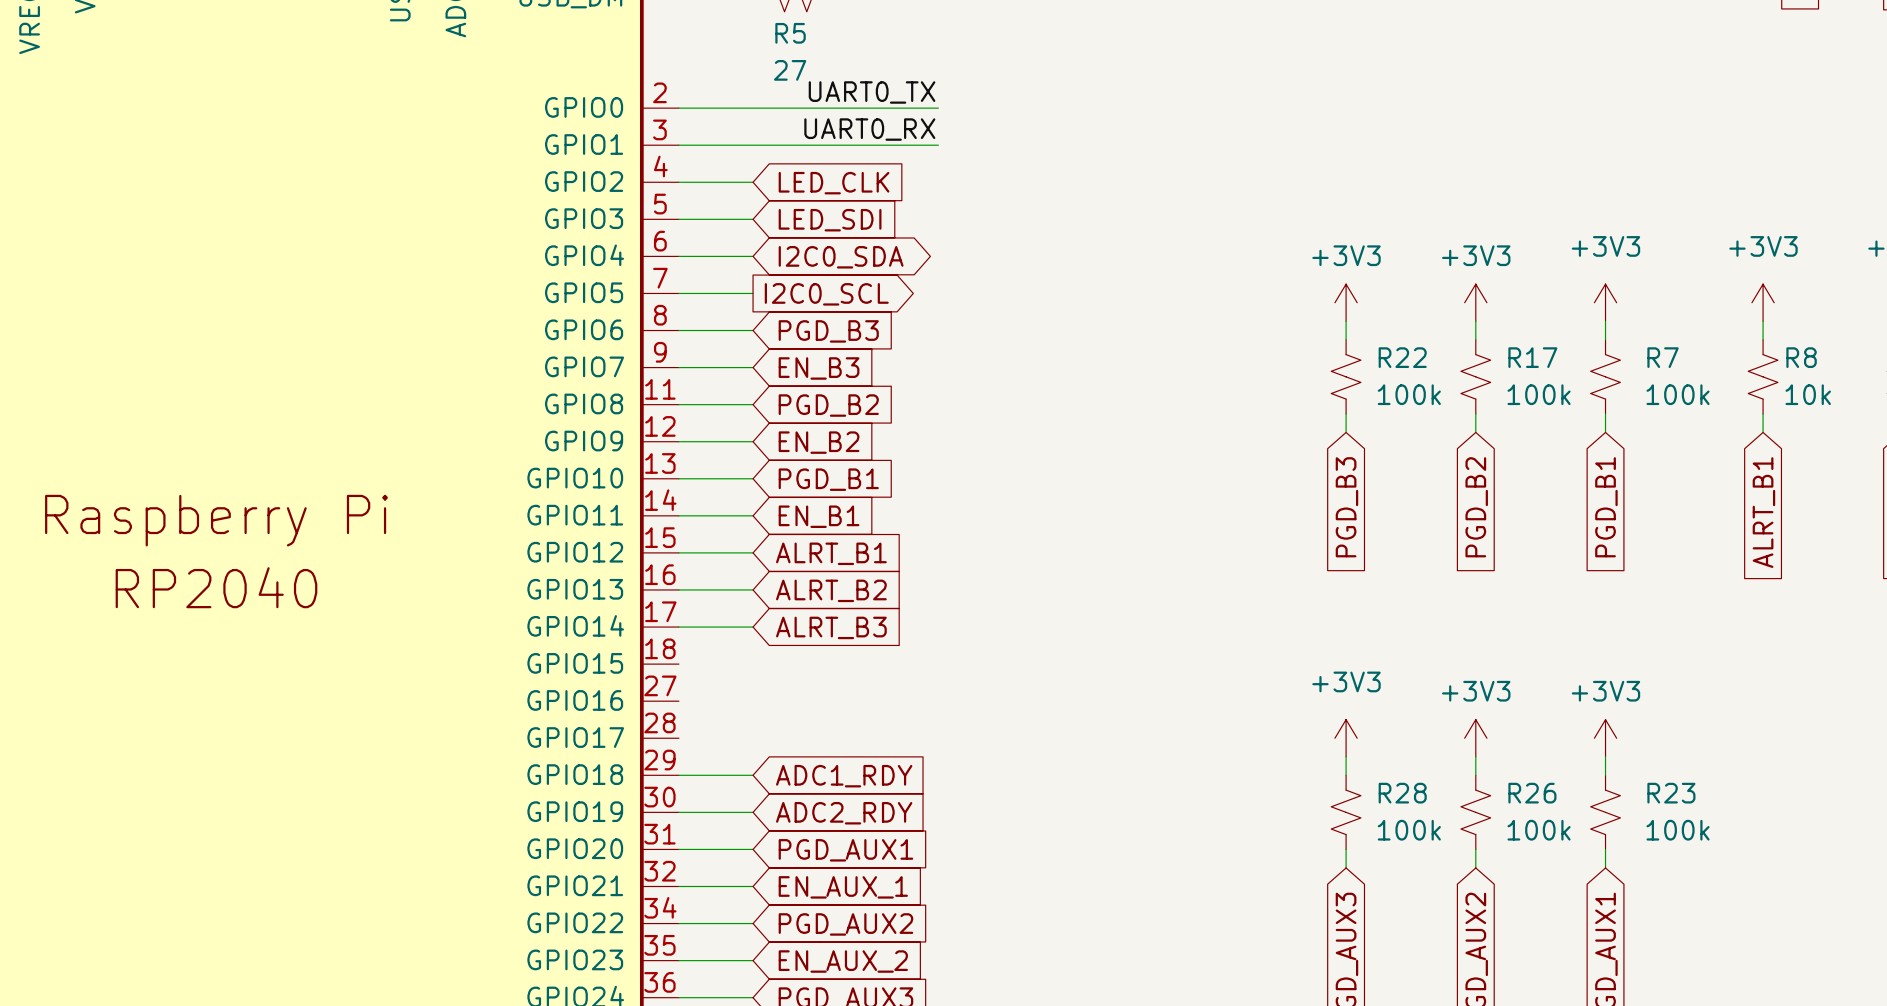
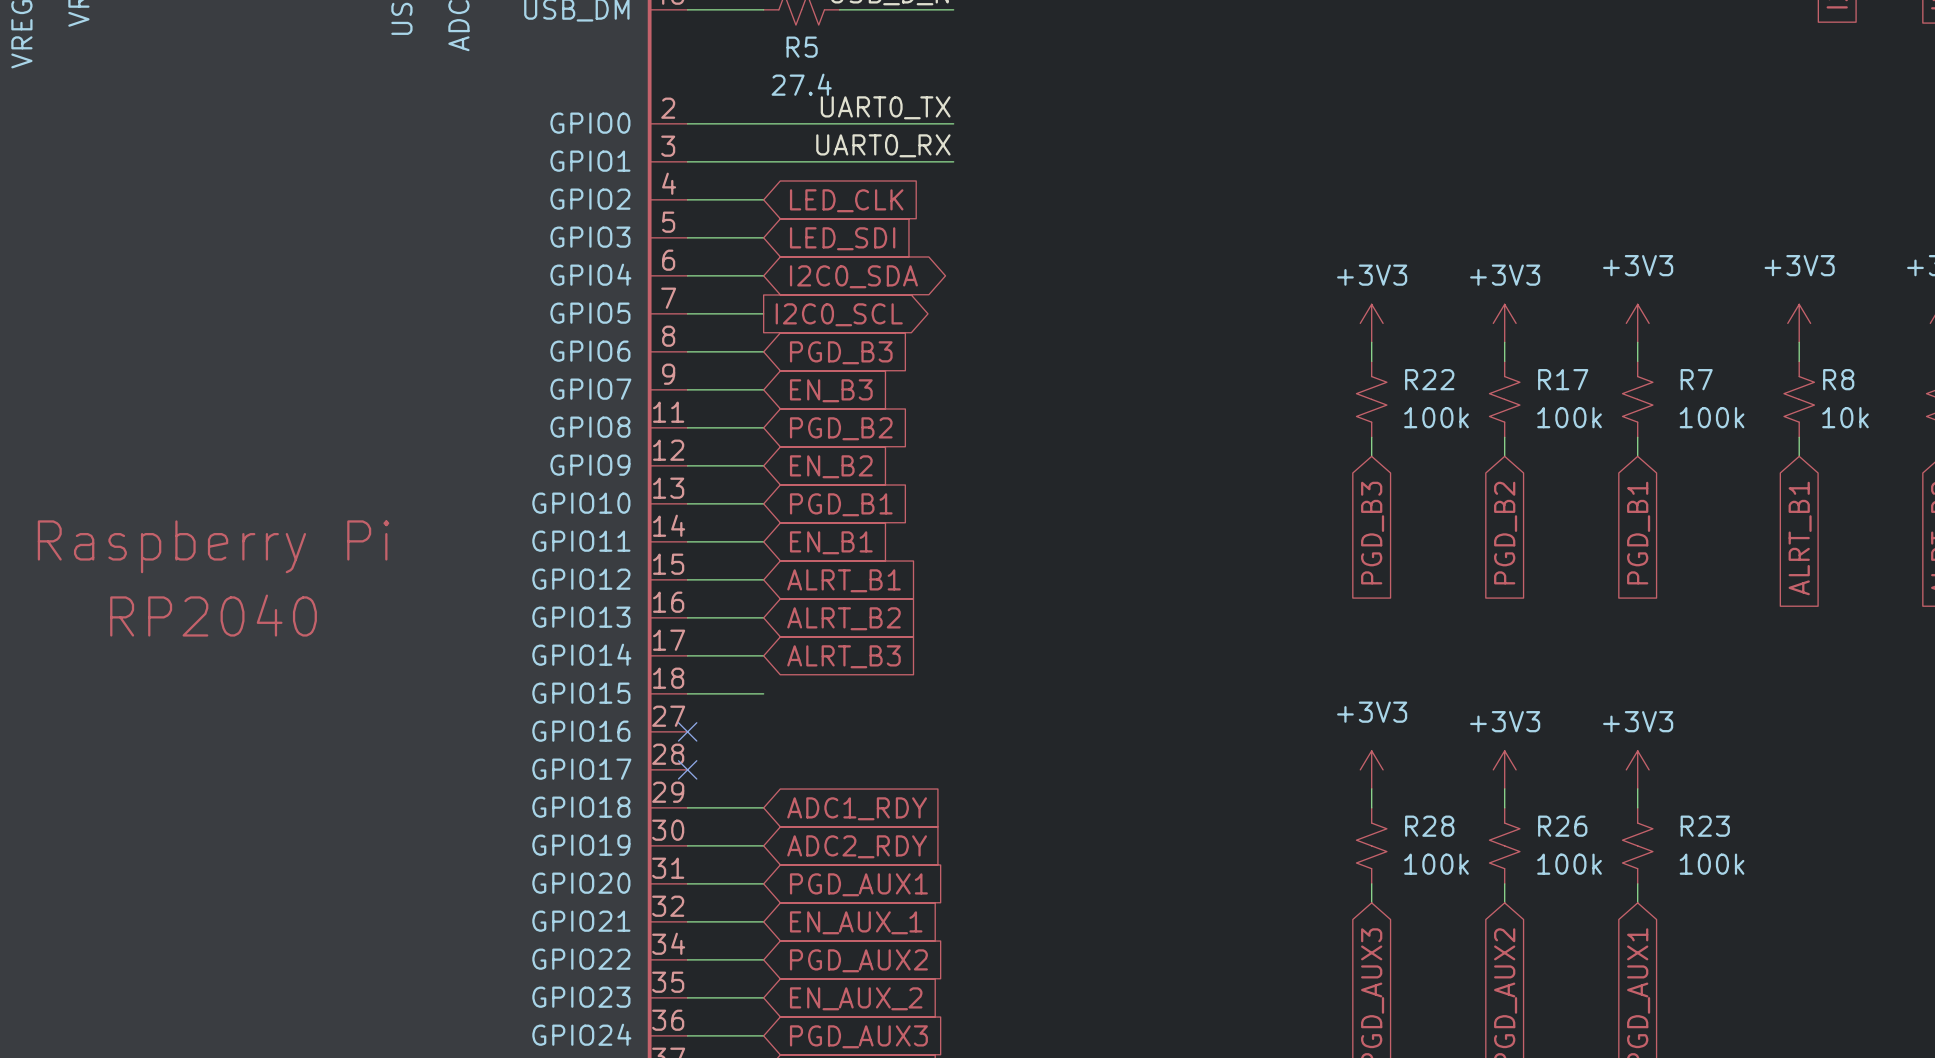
R5 value: 27 (790, 70) -> 27.4 (801, 84)
wire: none -> (687, 693) (763, 693)
no-connect mark: none -> (687, 731)
no-connect mark: none -> (687, 769)

